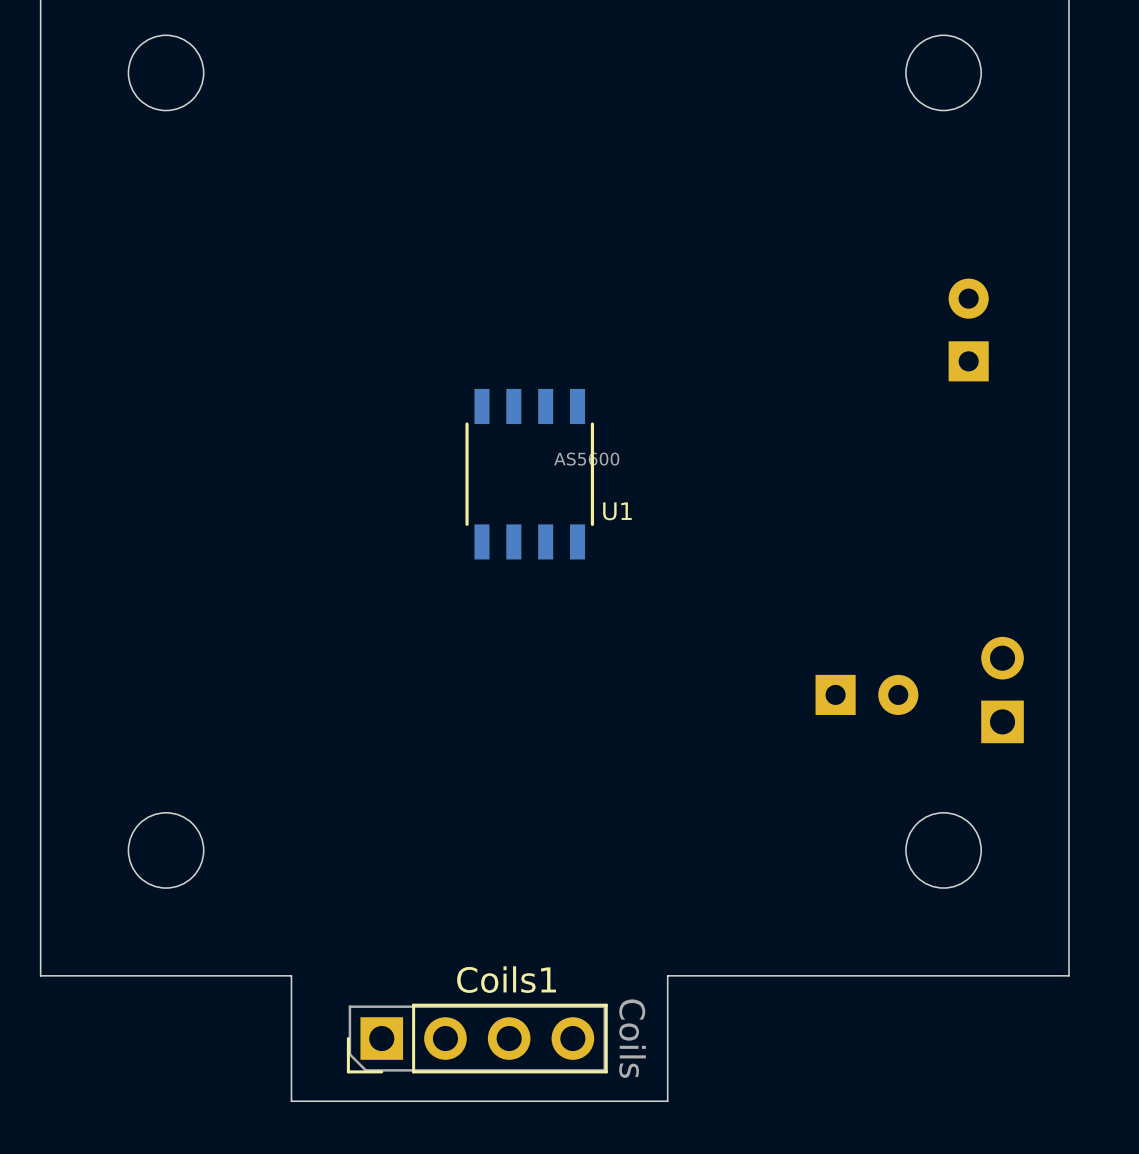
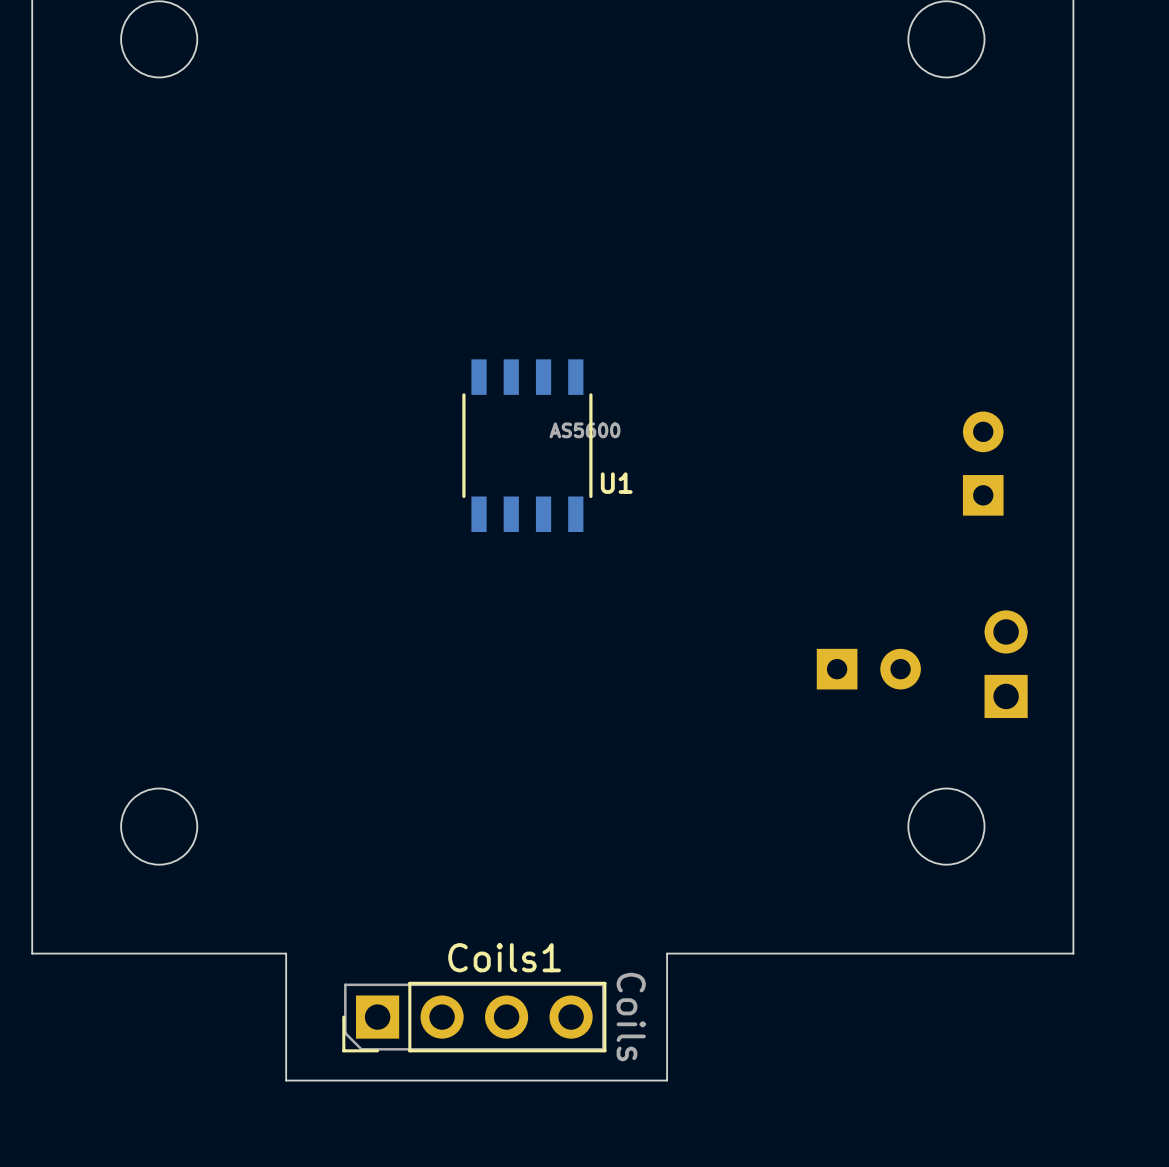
part position: (968, 329) -> (983, 463)

